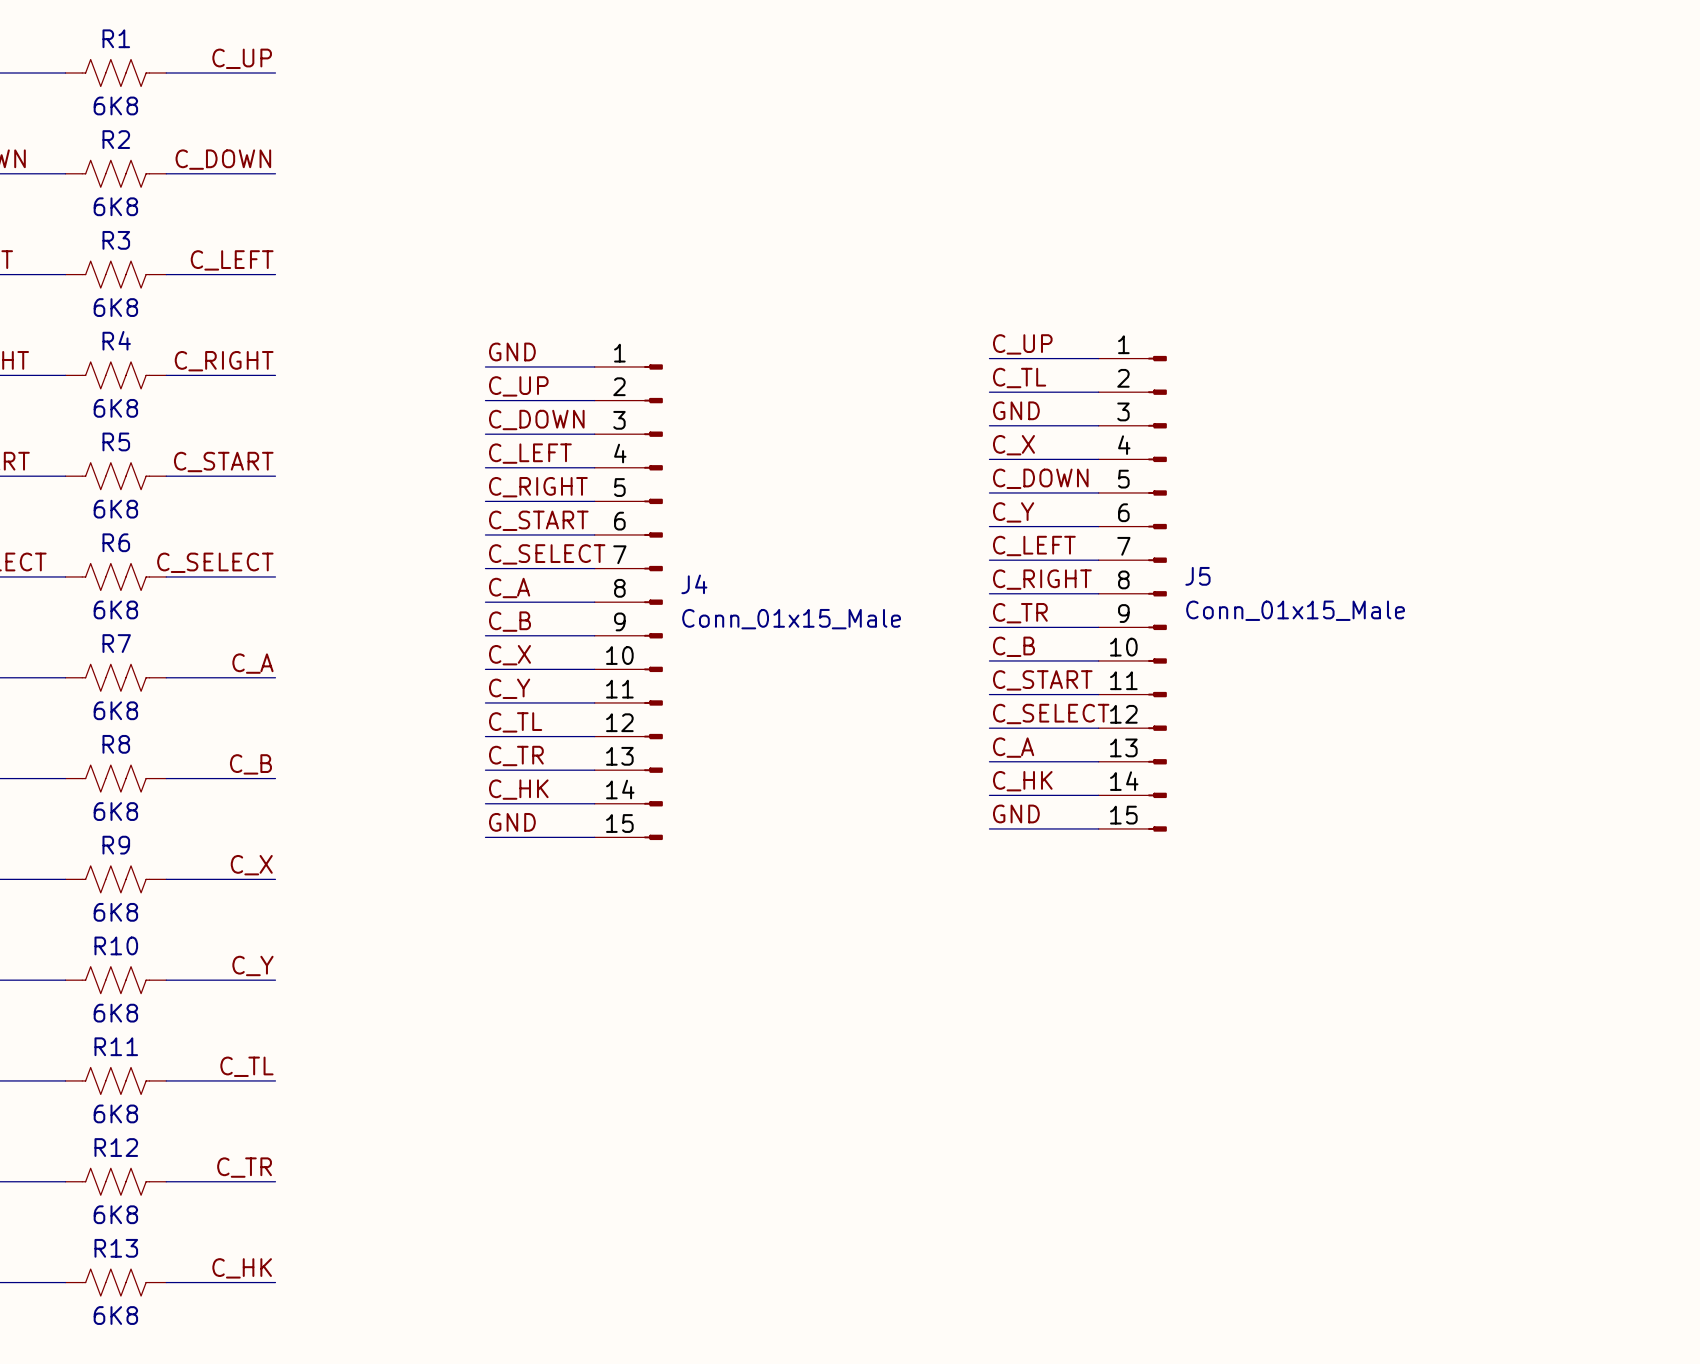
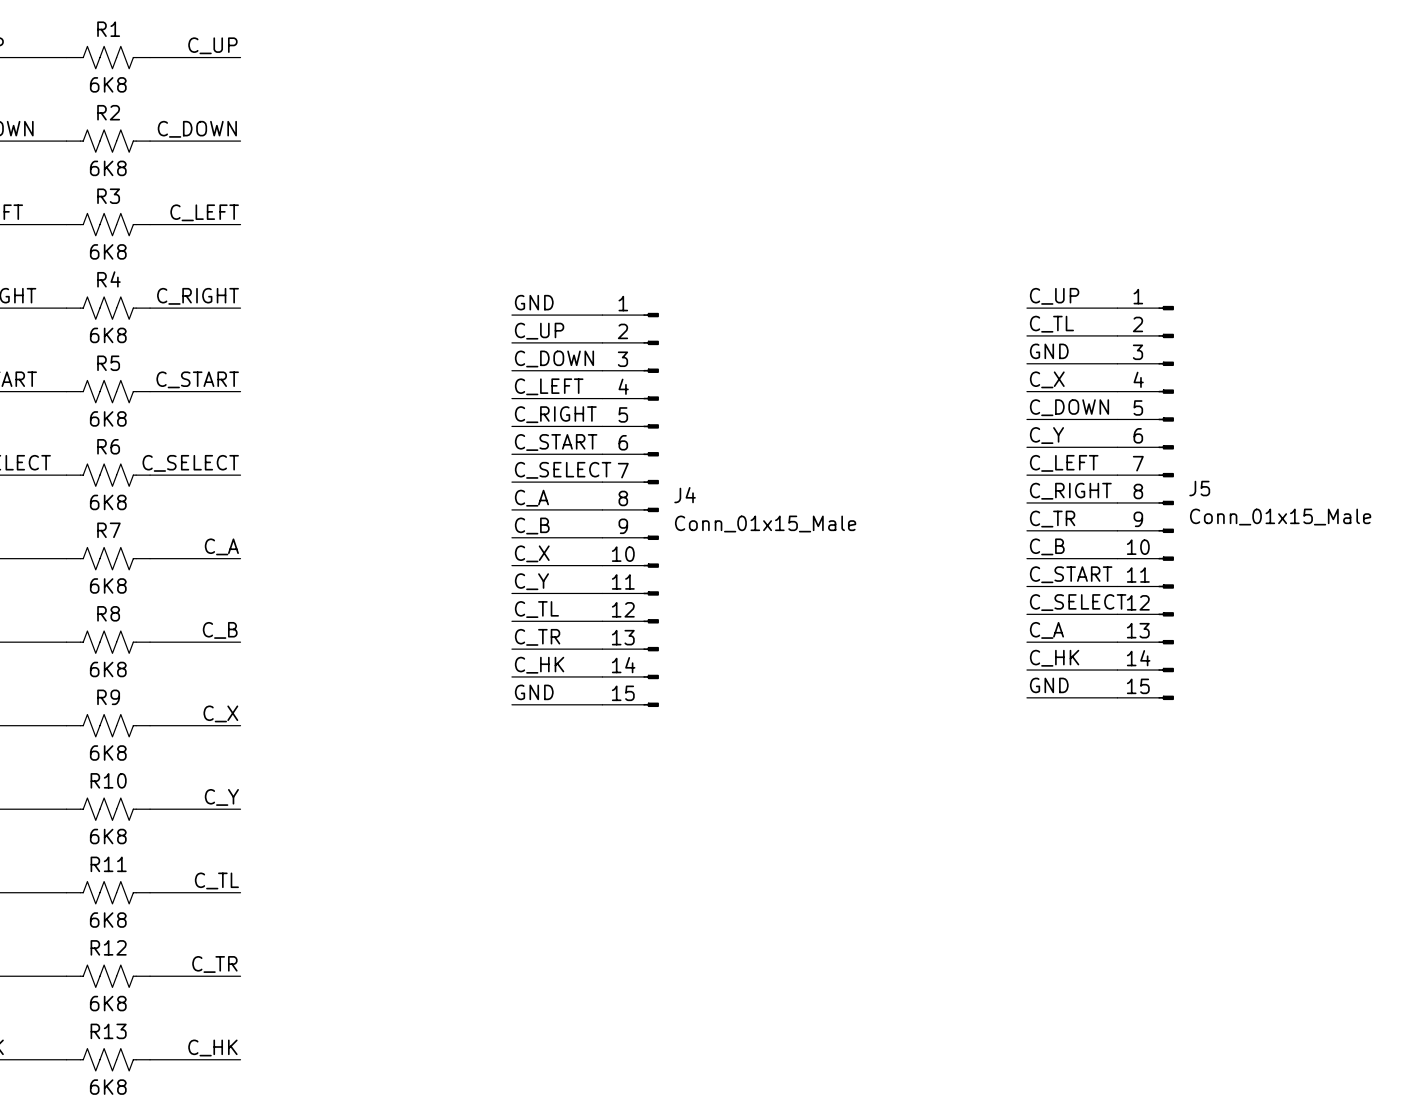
label: C_UP (1022, 344) -> none
label position: GND (512, 352) -> GND (534, 302)
wire: (989, 358) (1098, 358) -> (1026, 308) (1117, 308)
label: none -> C_UP (1054, 296)
wire: (485, 366) (594, 366) -> (511, 315) (602, 315)
label position: C_TL (1019, 377) -> C_TL (1051, 324)
label position: C_UP (518, 386) -> C_UP (539, 331)
wire: (989, 392) (1098, 392) -> (1026, 335) (1117, 335)
wire: (485, 400) (594, 400) -> (511, 342) (602, 342)
label: GND (1016, 410) -> none
label position: C_DOWN (536, 419) -> C_DOWN (554, 358)
wire: (989, 425) (1098, 425) -> (1026, 363) (1117, 363)
label: none -> GND (1049, 351)
wire: (485, 434) (594, 434) -> (511, 370) (602, 370)
label: C_X (1013, 445) -> none
label position: C_LEFT (530, 453) -> C_LEFT (549, 386)
wire: (989, 459) (1098, 459) -> (1026, 391) (1117, 391)
label: none -> C_X (1047, 379)
wire: (485, 467) (594, 467) -> (511, 398) (602, 398)
label: C_DOWN (1040, 478) -> none
label position: C_RIGHT (538, 487) -> C_RIGHT (555, 414)
wire: (989, 492) (1098, 492) -> (1026, 419) (1117, 419)
label: none -> C_DOWN (1069, 407)
wire: (485, 501) (594, 501) -> (511, 426) (602, 426)
label: C_Y (1013, 512) -> none
label position: C_START (538, 520) -> C_START (556, 442)
wire: (989, 526) (1098, 526) -> (1026, 447) (1117, 447)
label: none -> C_Y (1046, 435)
wire: (485, 534) (594, 534) -> (511, 454) (602, 454)
label: C_LEFT (1034, 545) -> none
label position: C_SELECT (547, 554) -> C_SELECT (563, 470)
wire: (989, 560) (1098, 560) -> (1026, 475) (1117, 475)
label: none -> C_LEFT (1064, 463)
wire: (485, 568) (594, 568) -> (511, 482) (602, 482)
label: C_RIGHT (1042, 579) -> none
label position: C_A (509, 587) -> C_A (531, 498)
wire: (989, 593) (1098, 593) -> (1026, 502) (1117, 502)
J5 position: (1132, 593) -> (1145, 502)
label: none -> C_RIGHT (1070, 491)
wire: (485, 602) (594, 602) -> (511, 509) (602, 509)
J4 position: (628, 602) -> (630, 509)
label: C_TR (1020, 613) -> none
label position: C_B (509, 621) -> C_B (532, 526)
wire: (989, 627) (1098, 627) -> (1026, 530) (1117, 530)
label: none -> C_TR (1052, 519)
wire: (485, 635) (594, 635) -> (511, 537) (602, 537)
label: C_B (1013, 646) -> none
label position: C_X (509, 655) -> C_X (532, 553)
wire: (989, 660) (1098, 660) -> (1026, 558) (1117, 558)
label: none -> C_B (1047, 546)
wire: (485, 669) (594, 669) -> (511, 565) (602, 565)
label: C_START (1042, 680) -> none
label position: C_Y (509, 688) -> C_Y (531, 581)
wire: (989, 694) (1098, 694) -> (1026, 586) (1117, 586)
label: none -> C_START (1071, 574)
wire: (485, 702) (594, 702) -> (511, 593) (602, 593)
label: C_SELECT (1051, 713) -> none
label position: C_TL (515, 722) -> C_TL (536, 609)
wire: (989, 728) (1098, 728) -> (1026, 614) (1117, 614)
label: none -> C_SELECT (1078, 602)
wire: (485, 736) (594, 736) -> (511, 621) (602, 621)
label: C_A (1013, 747) -> none
label position: C_TR (516, 755) -> C_TR (537, 637)
wire: (989, 761) (1098, 761) -> (1026, 642) (1117, 642)
label: none -> C_A (1046, 630)
wire: (485, 770) (594, 770) -> (511, 649) (602, 649)
label: C_HK (1022, 781) -> none
label position: C_HK (518, 789) -> C_HK (539, 665)
wire: (989, 795) (1098, 795) -> (1026, 670) (1117, 670)
label: none -> C_HK (1054, 658)
wire: (485, 803) (594, 803) -> (511, 676) (602, 676)
label: GND (1016, 813) -> none
label position: GND (512, 822) -> GND (534, 692)
wire: (989, 828) (1098, 828) -> (1026, 697) (1117, 697)
label: none -> GND (1049, 685)
wire: (485, 837) (594, 837) -> (511, 704) (602, 704)

